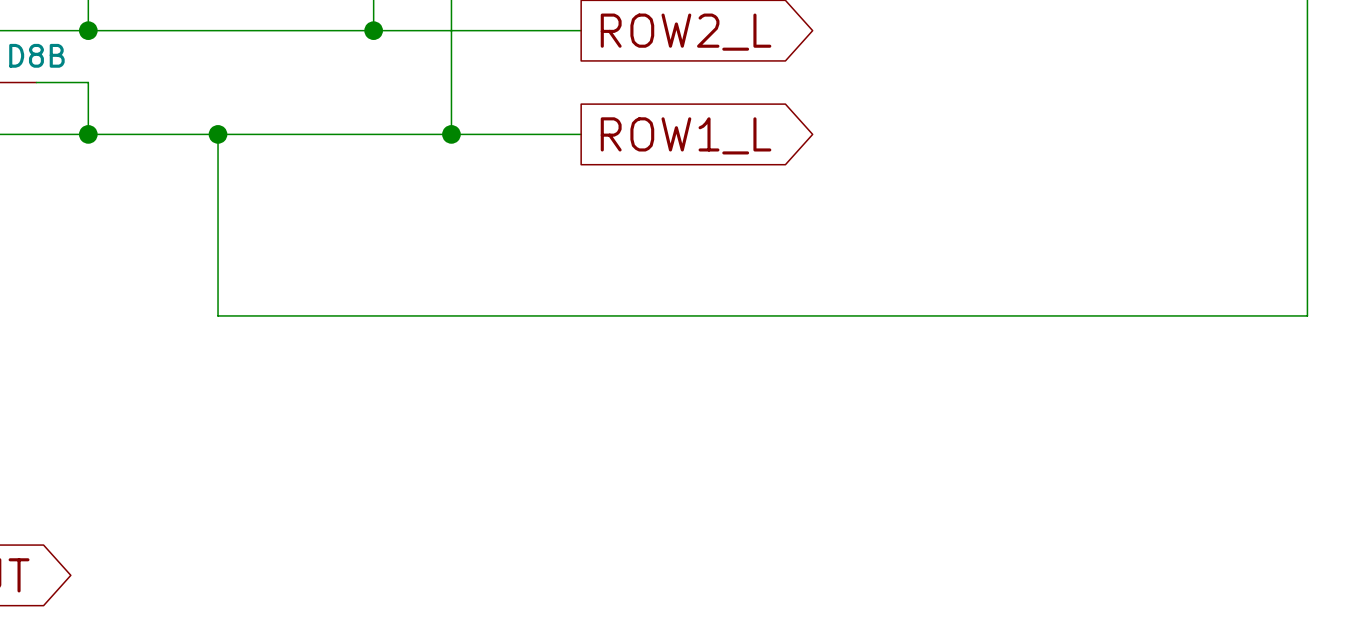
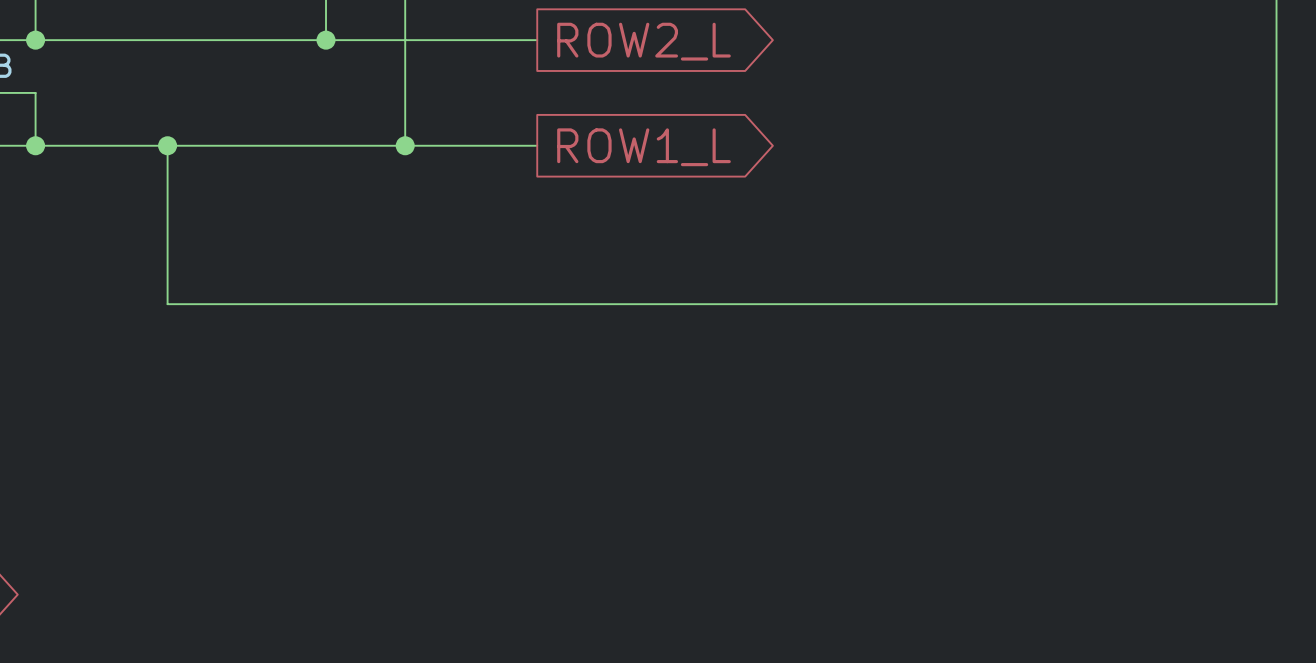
wire: (218, 290) (218, 315) (1307, 315) (1307, 290) -> (167, 304) (1276, 304)

